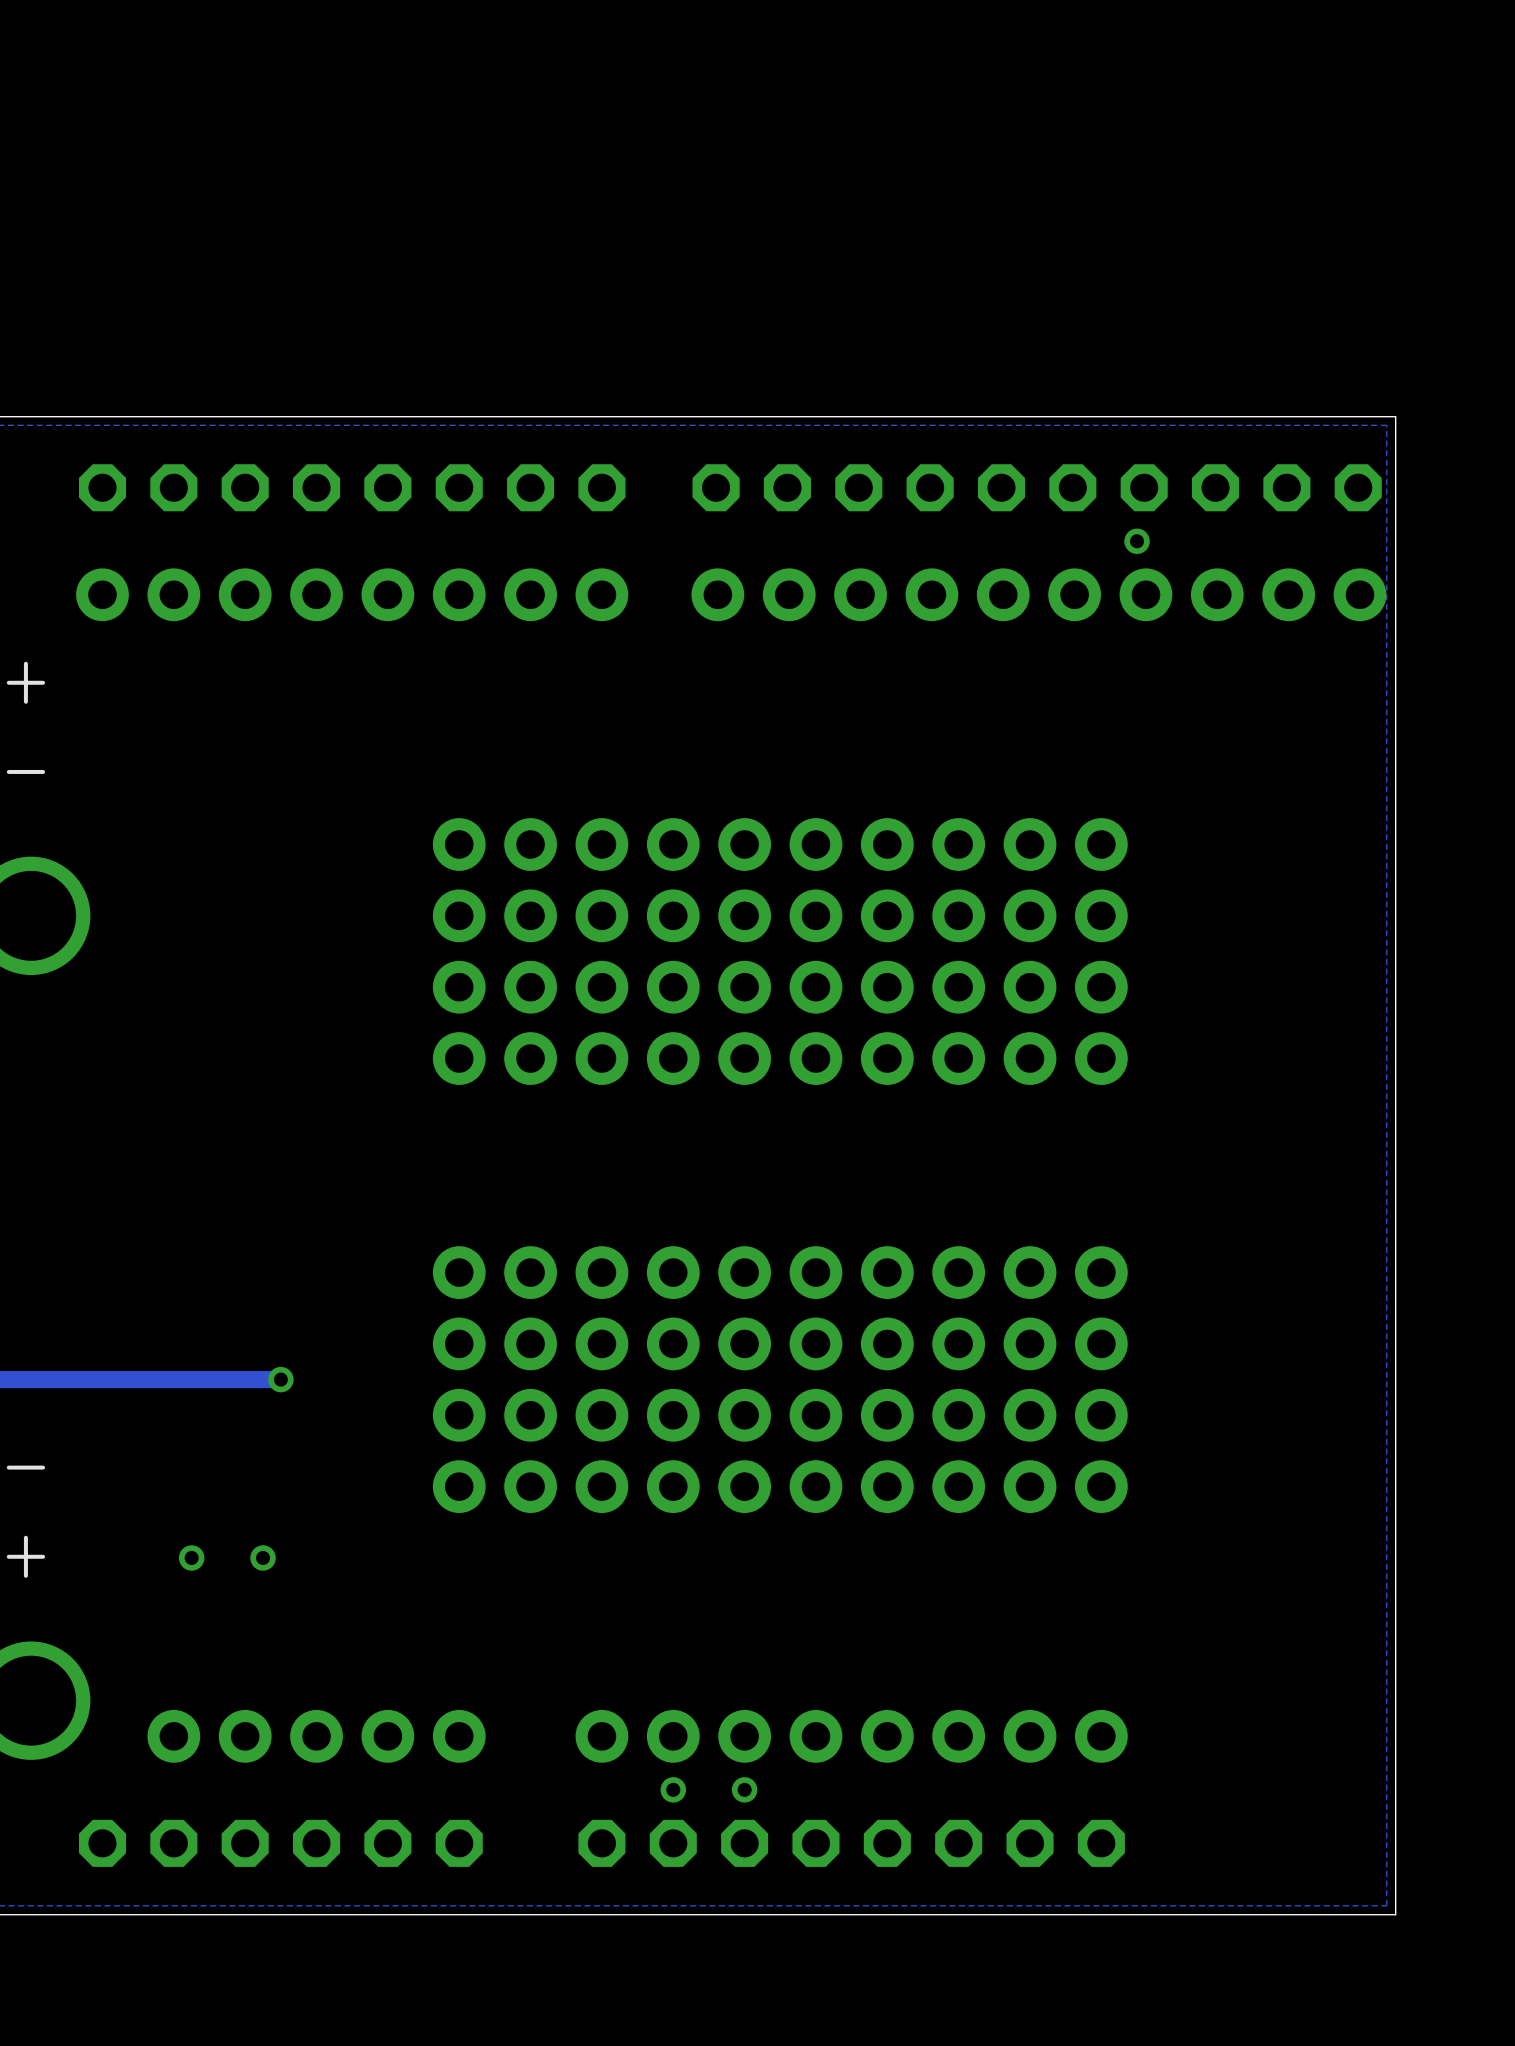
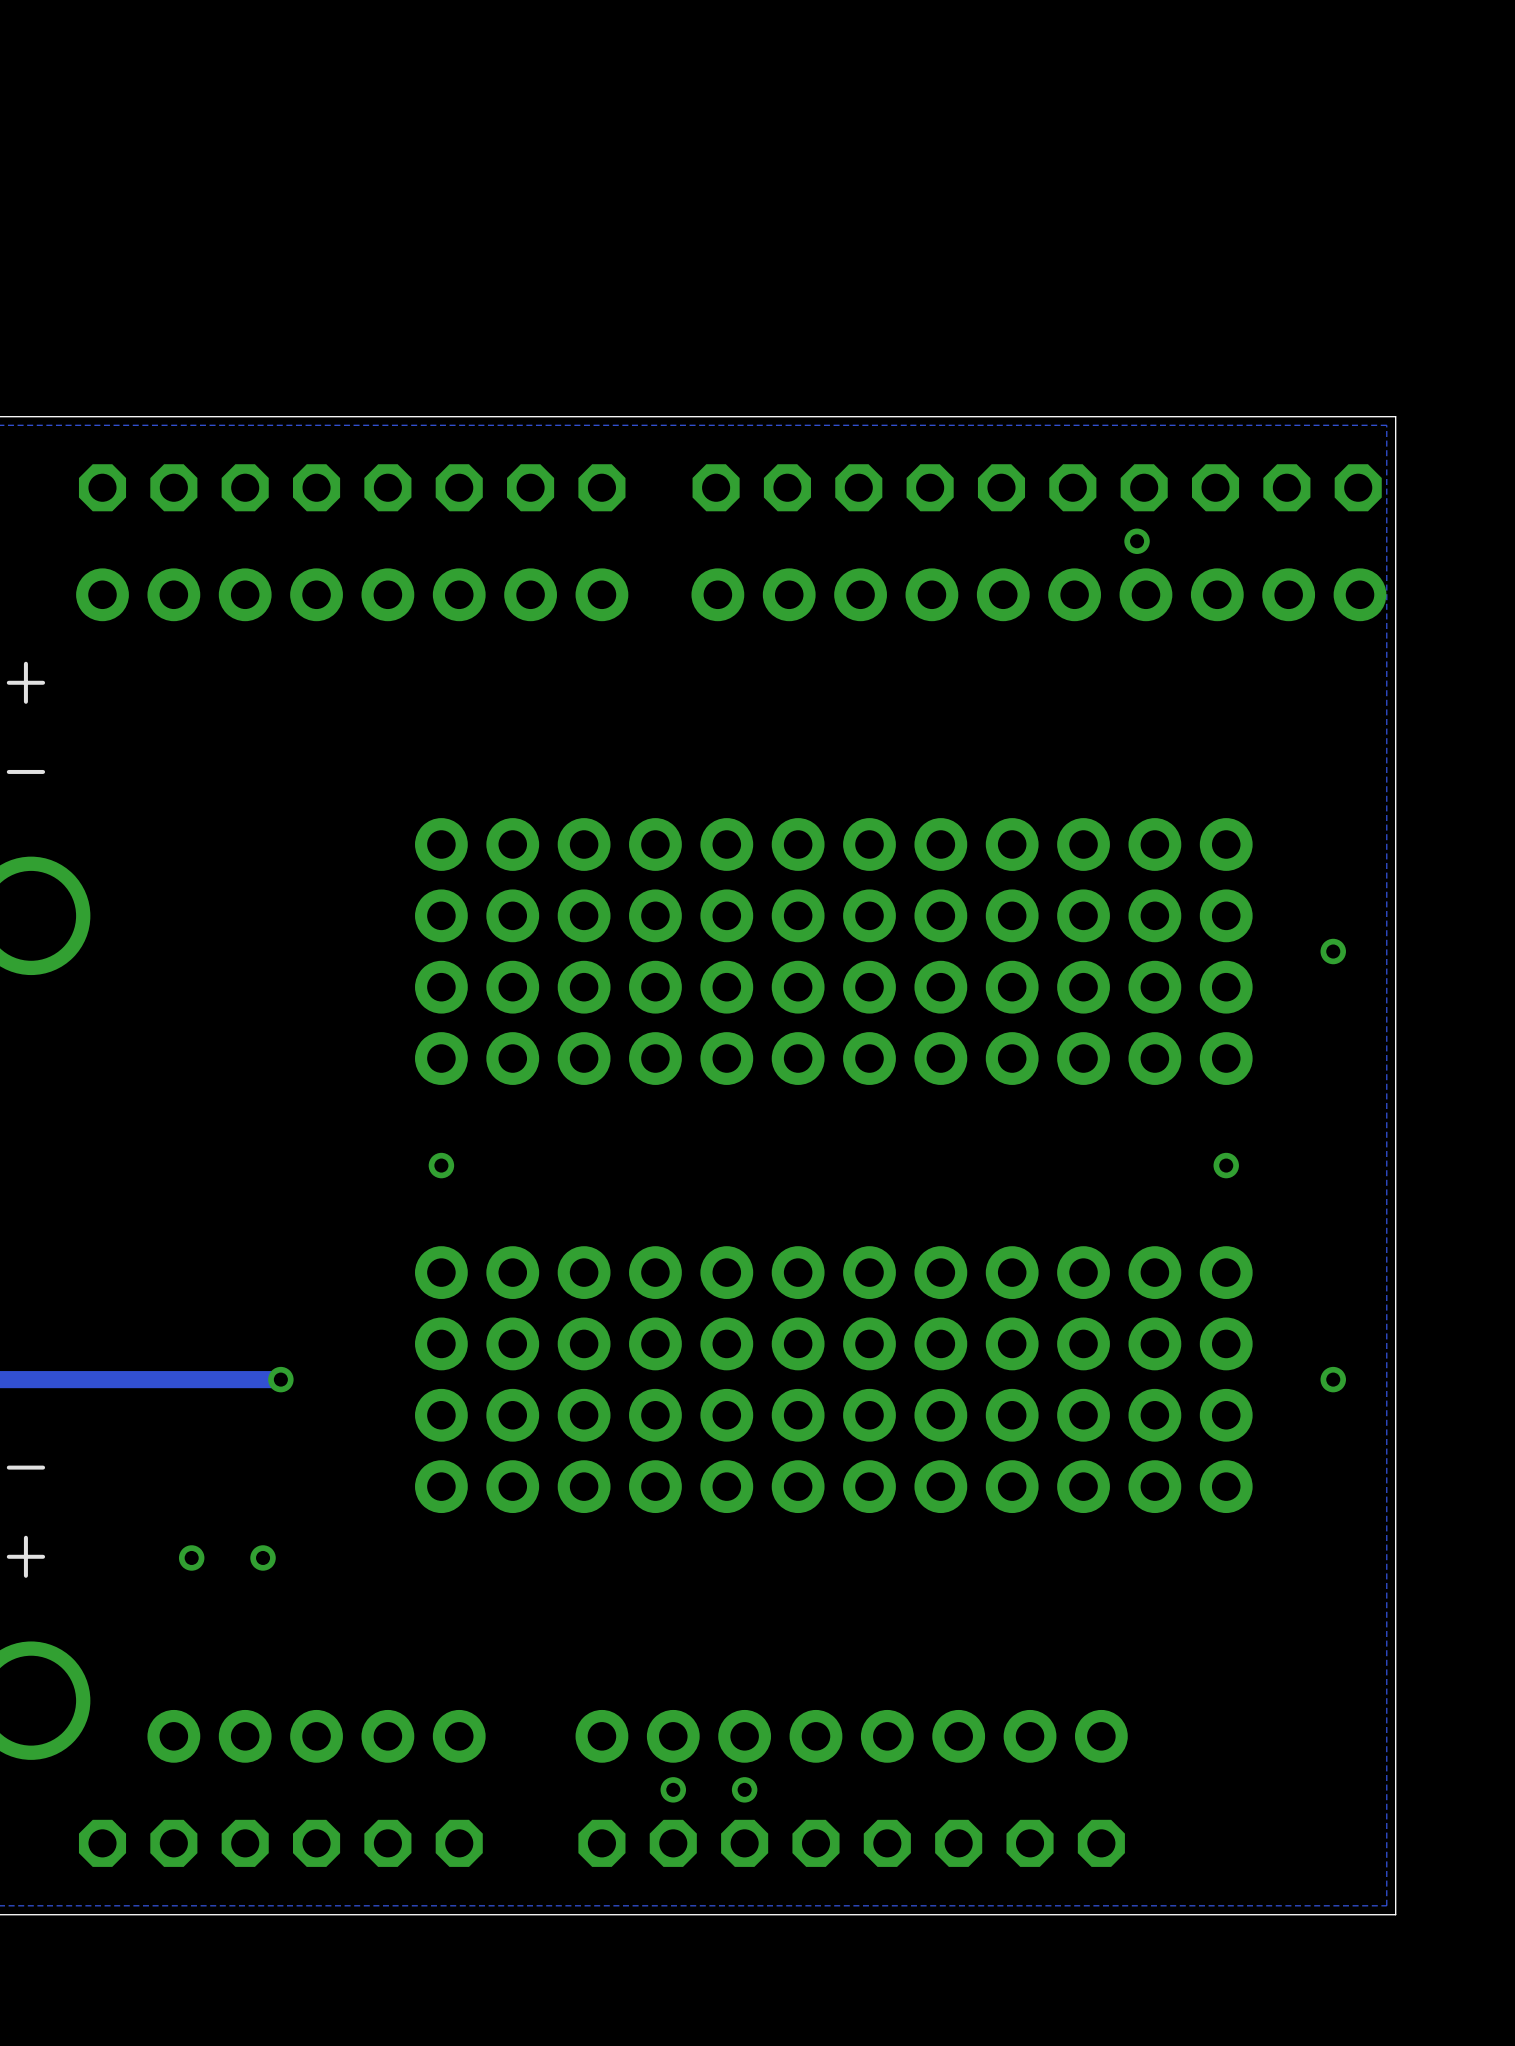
part footprint: [432, 818, 772, 1085] -> [415, 818, 825, 1085]
part: (958, 951) -> none
part: none -> (1047, 951)
via: none -> (1333, 951)
via: none -> (441, 1165)
via: none -> (1226, 1165)
part footprint: [432, 1246, 772, 1514] -> [415, 1246, 825, 1514]
part: (958, 1379) -> none
part: none -> (1047, 1379)
via: none -> (1333, 1379)

